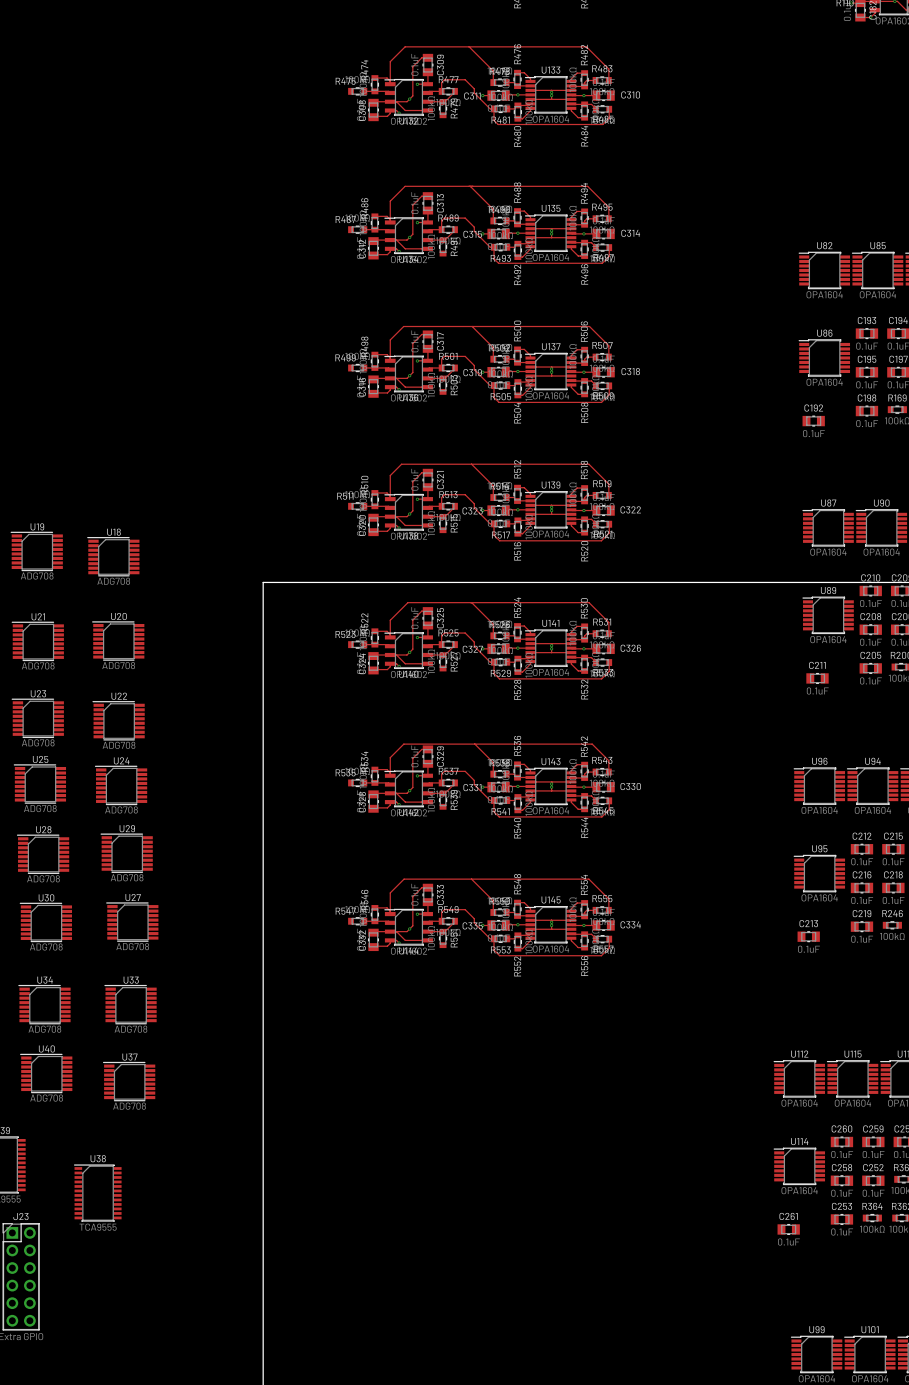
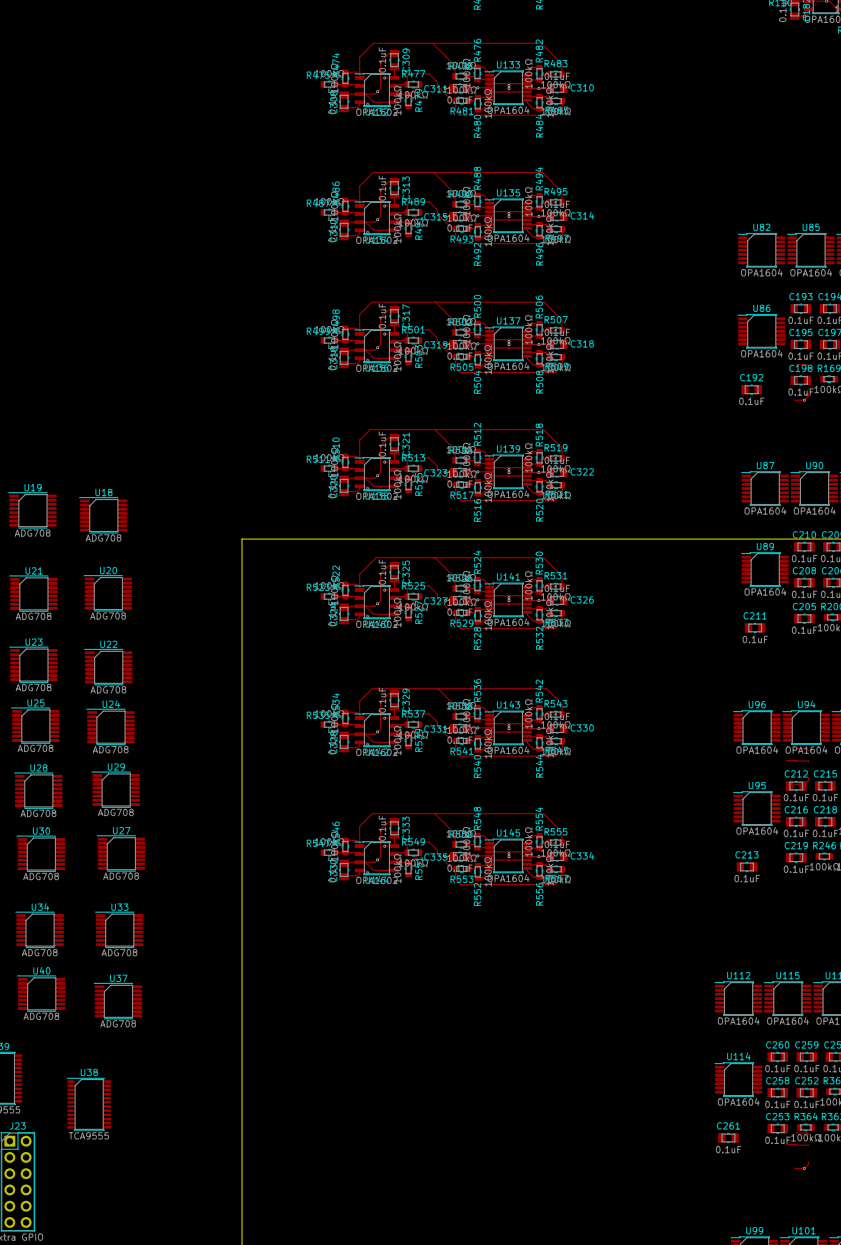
track: none -> (796, 364) (808, 366)
track: none -> (808, 393) (804, 400) (794, 400)
via: none -> (804, 400)
track: none -> (796, 748) (808, 750)
track: none -> (786, 760) (808, 761)
track: none -> (808, 777) (804, 784) (794, 784)
track: none -> (796, 1132) (808, 1134)
track: none -> (786, 1144) (808, 1145)
track: none -> (808, 1161) (804, 1168) (794, 1168)
via: none -> (804, 1168)

